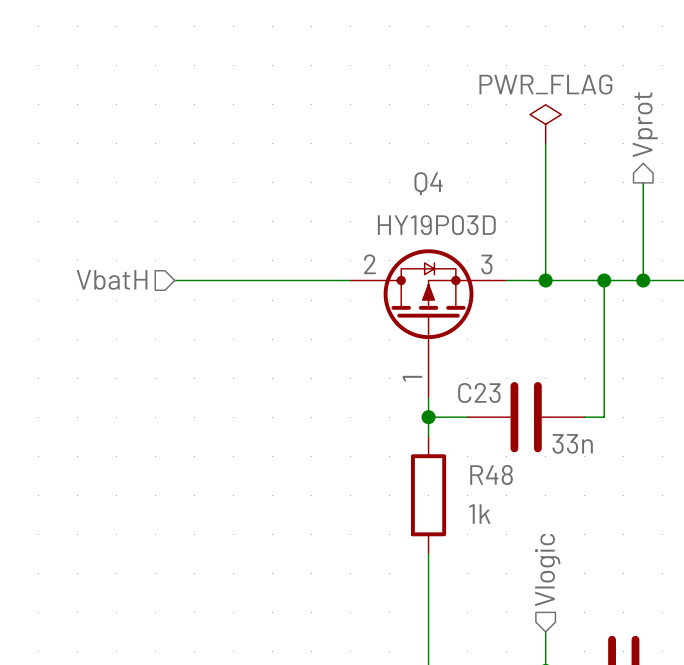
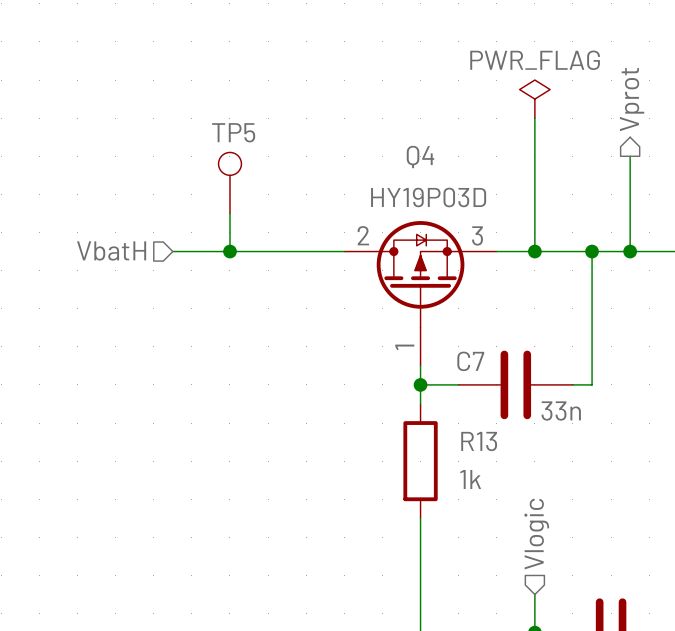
TP5: none -> (229, 182)
wire: none -> (229, 213) (229, 251)
junction: none -> (229, 251)
C23 name: C23 (479, 393) -> C7 (470, 361)
R48 name: R48 (491, 474) -> R13 (479, 441)

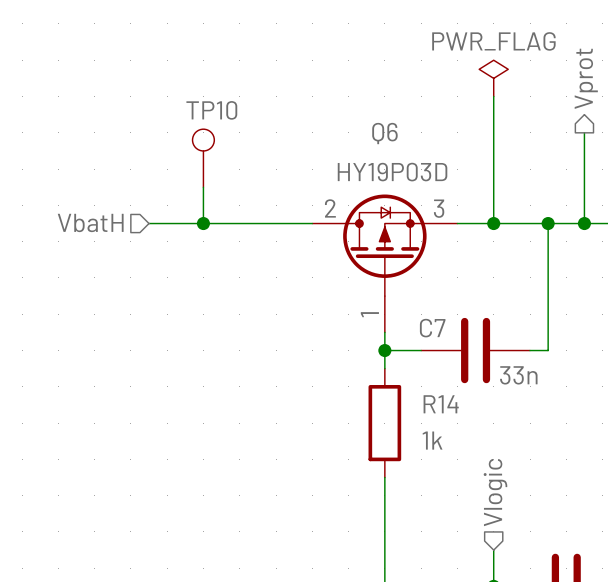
TP5 name: TP5 (233, 132) -> TP10 (211, 110)
Q4 name: Q4 (420, 157) -> Q6 (384, 133)
R13 name: R13 (479, 441) -> R14 (441, 404)

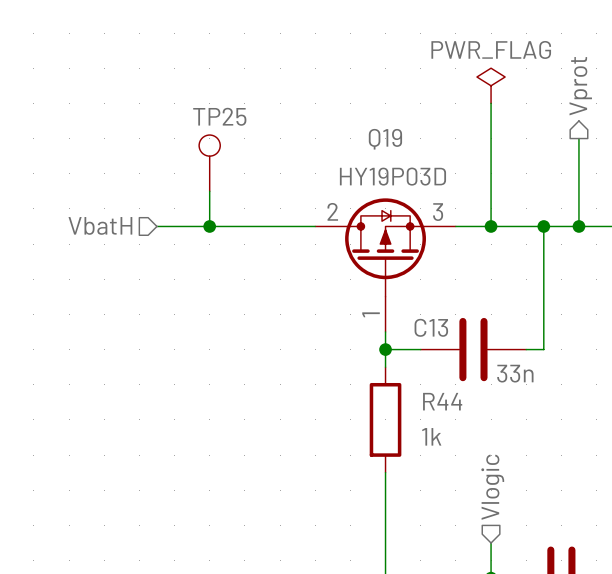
TP10 name: TP10 (211, 110) -> TP25 (219, 116)
Q6 name: Q6 (384, 133) -> Q19 (385, 139)
C7 name: C7 (432, 328) -> C13 (431, 327)
R14 name: R14 (441, 404) -> R44 (442, 401)

